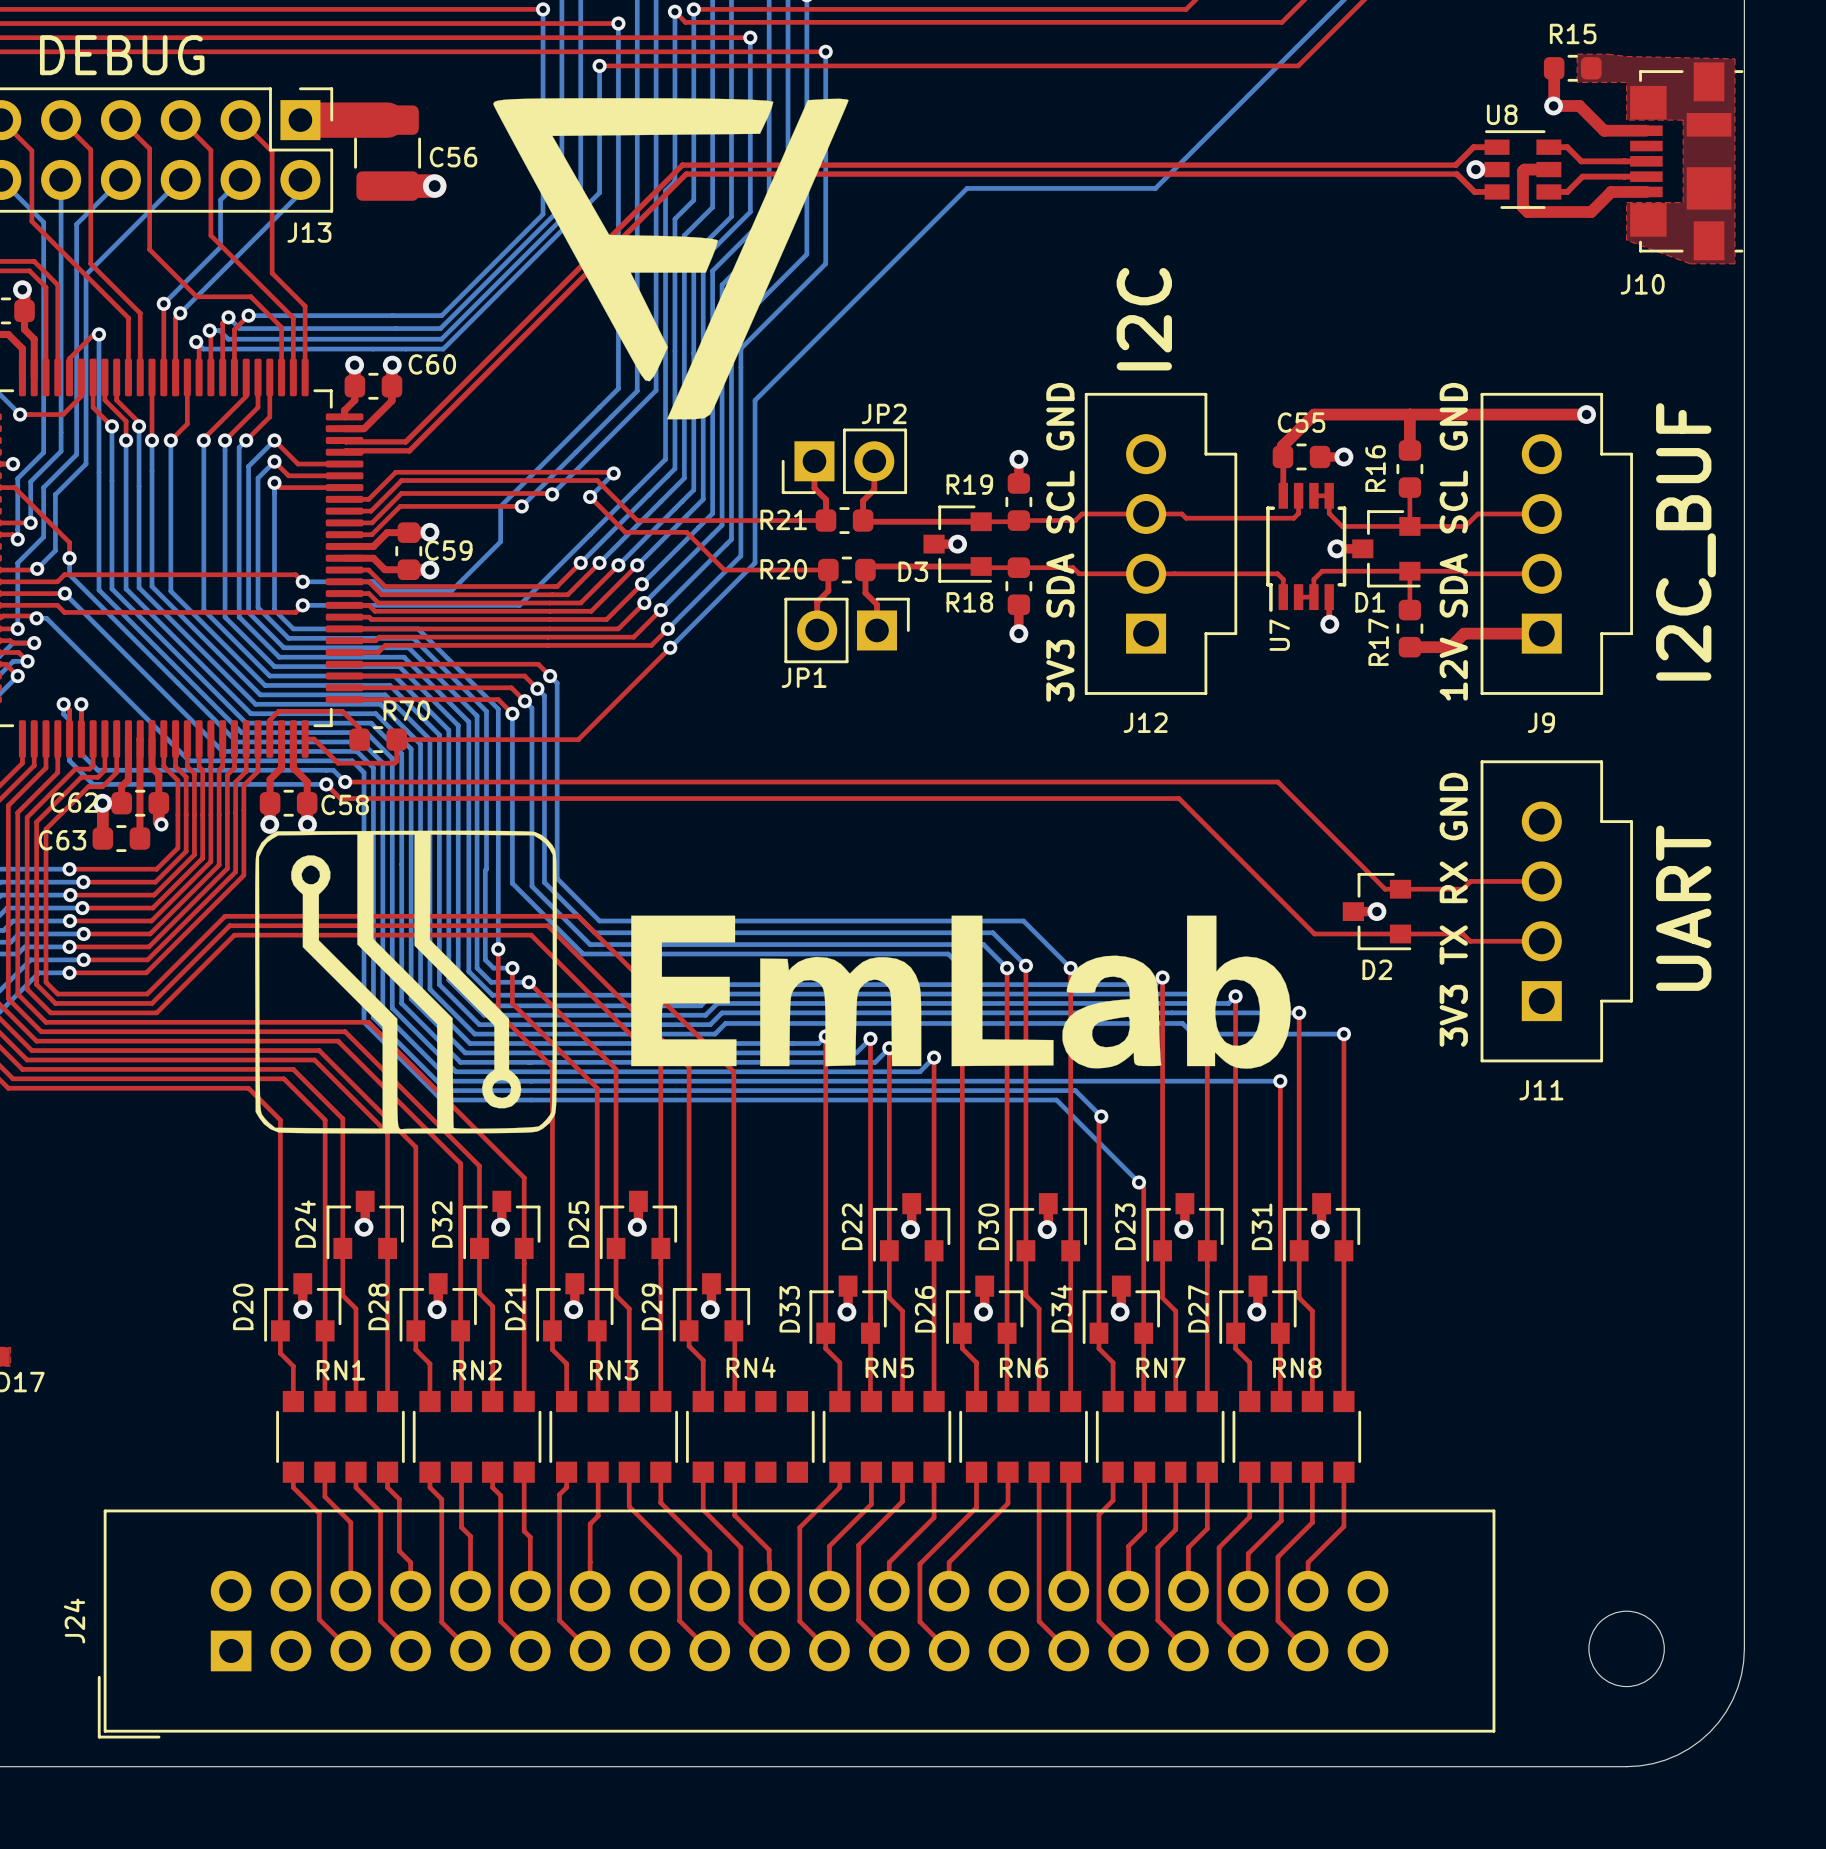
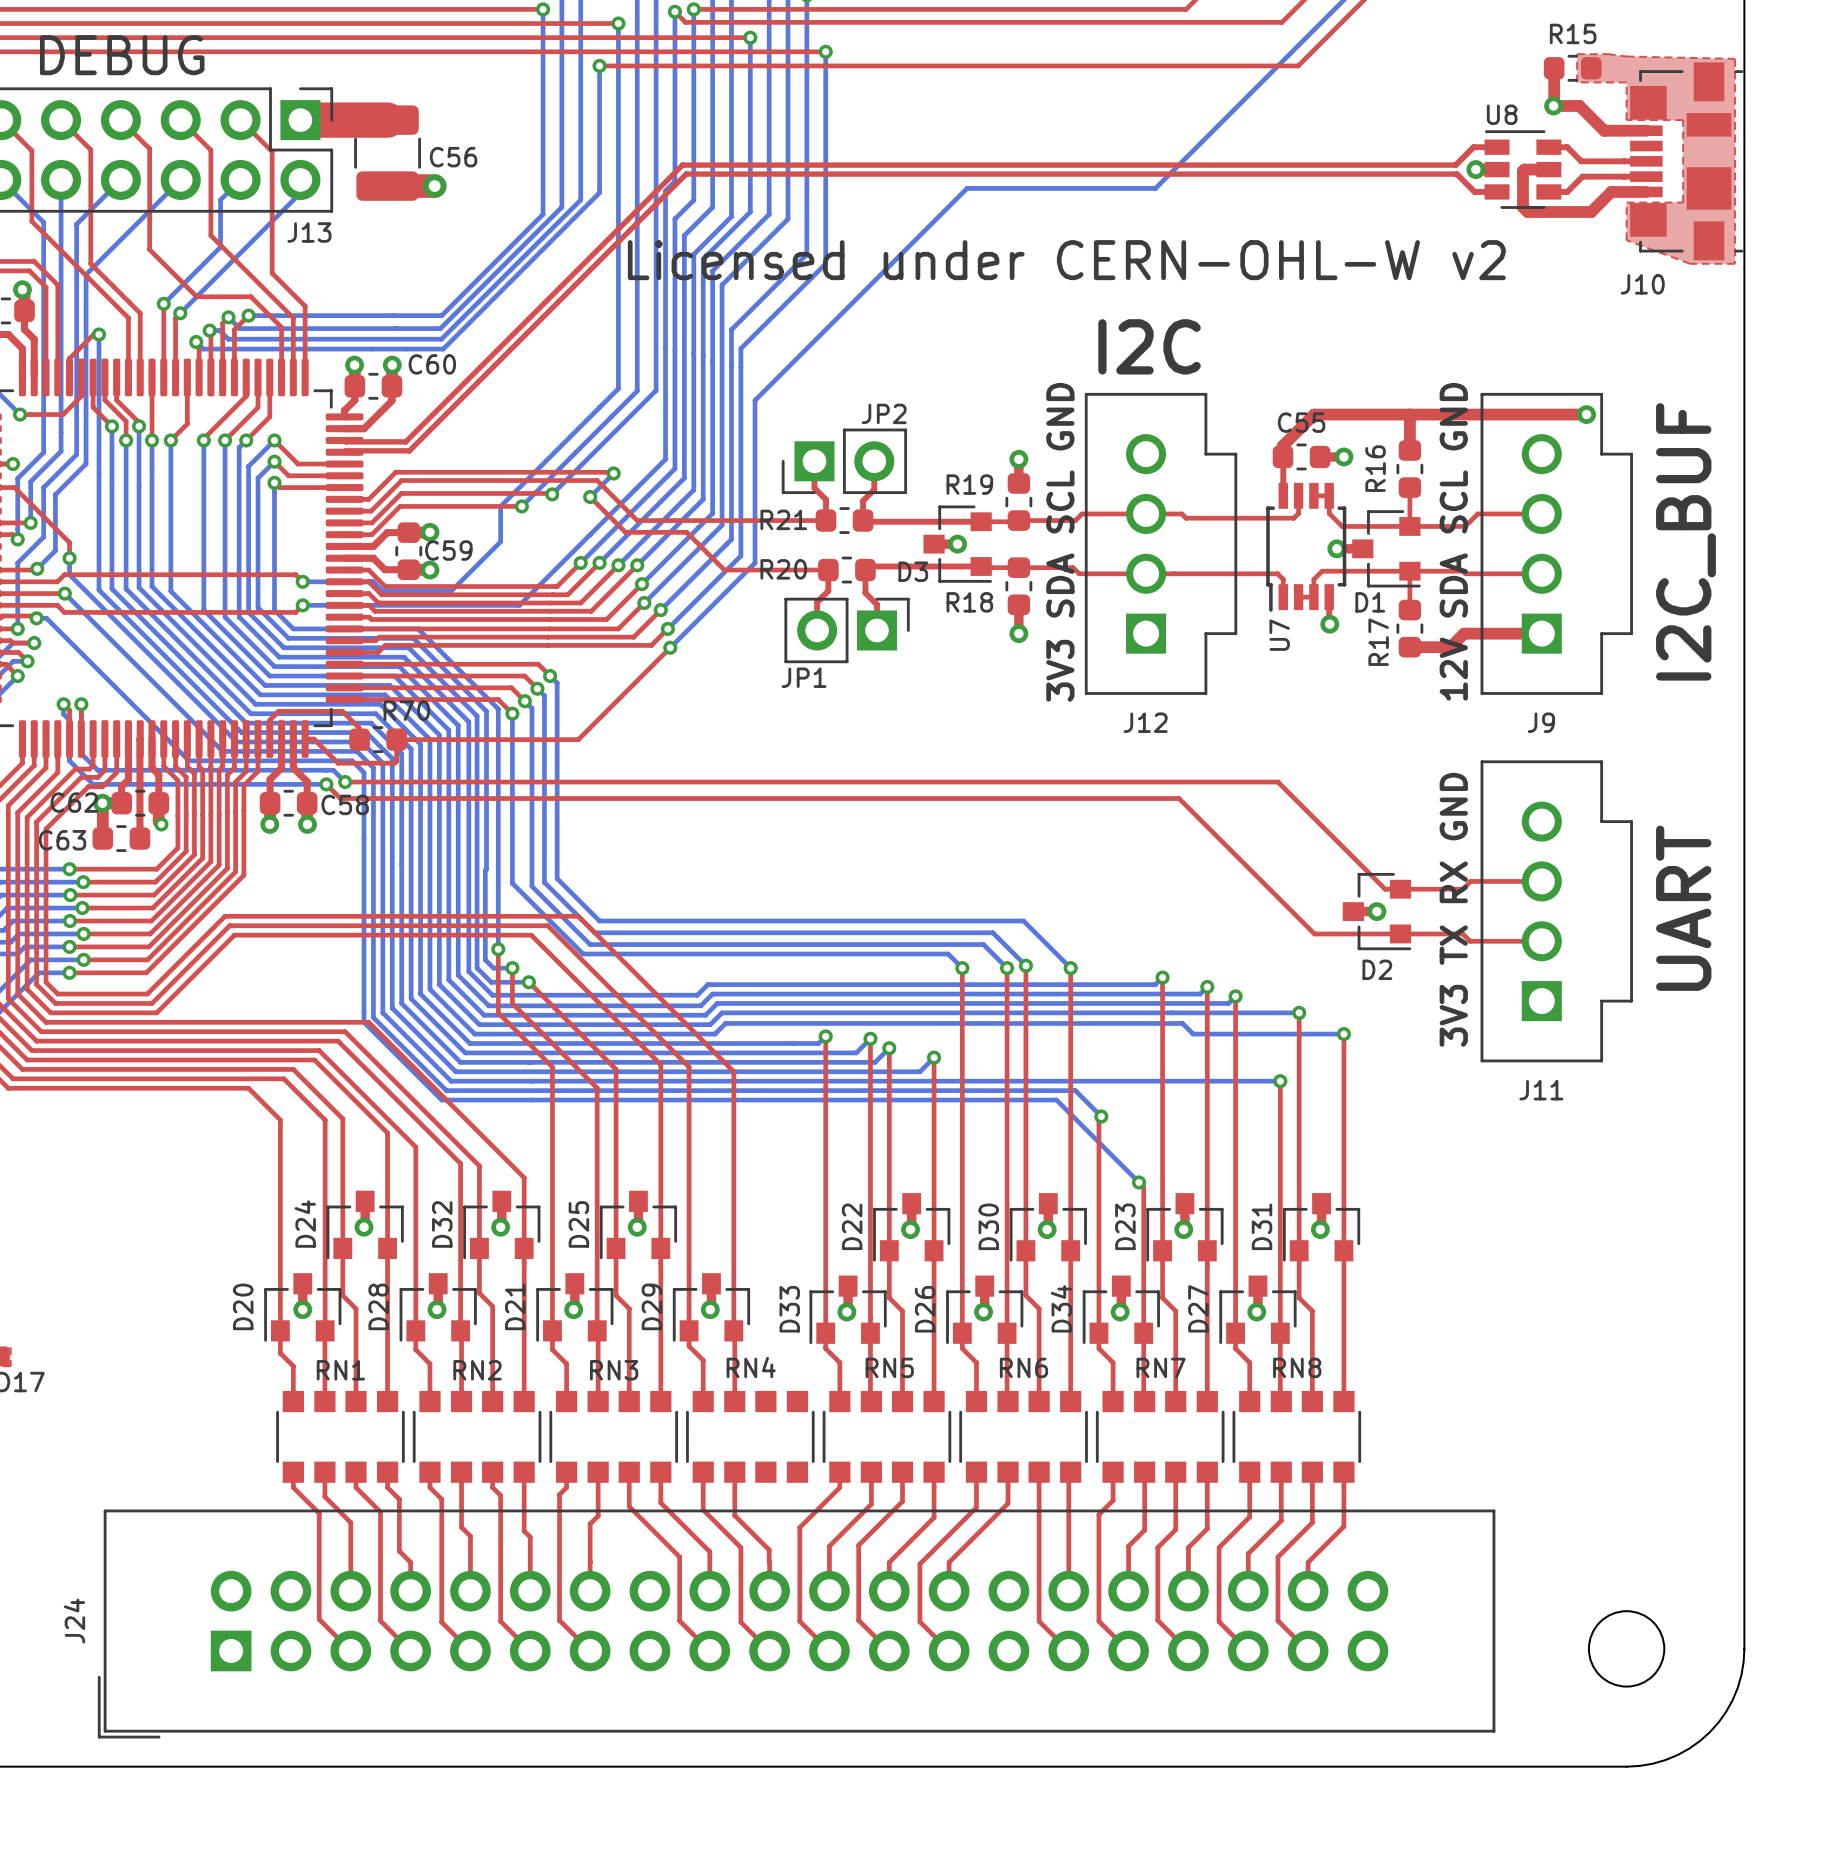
drawing: [493, 98, 849, 420] -> none
text: none -> Licensed under CERN-OHL-W v2 (1066, 260)
text rotation: 0° (1144, 319) -> 90° clockwise (1149, 346)
drawing: [255, 830, 1291, 1134] -> none

